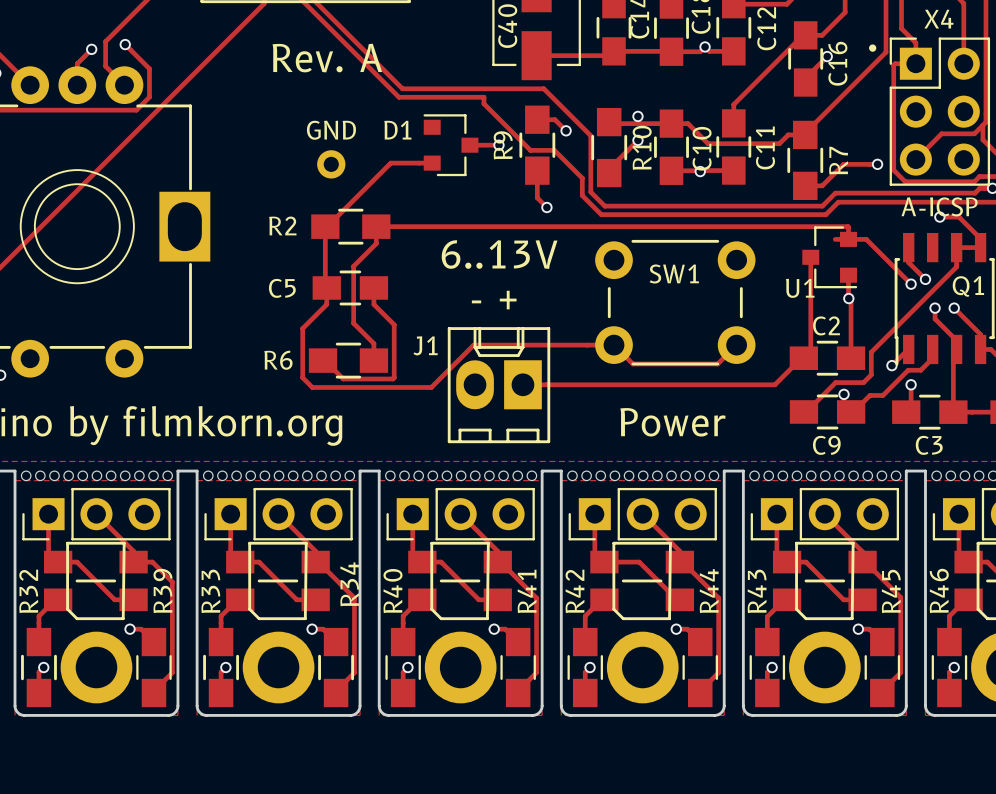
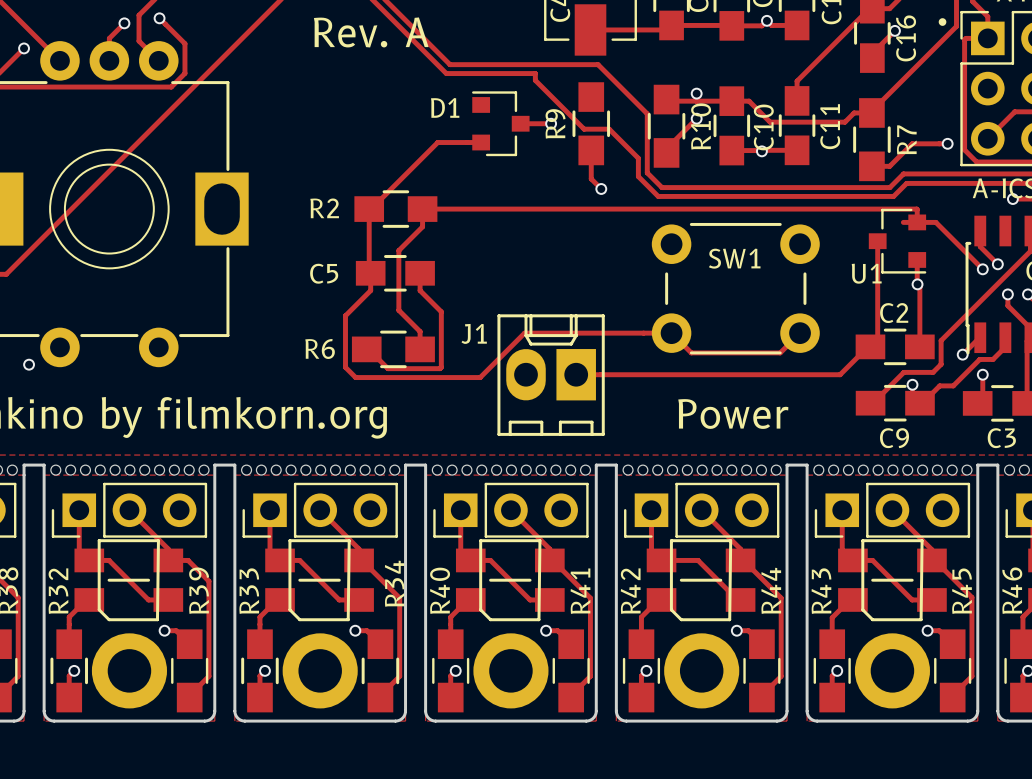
track: (537, 119) (554, 119) (566, 130) -> none
via: (566, 130) -> none
GND: (331, 164) -> none
text: 6..13V (499, 254) -> none
text: - + (494, 300) -> none

